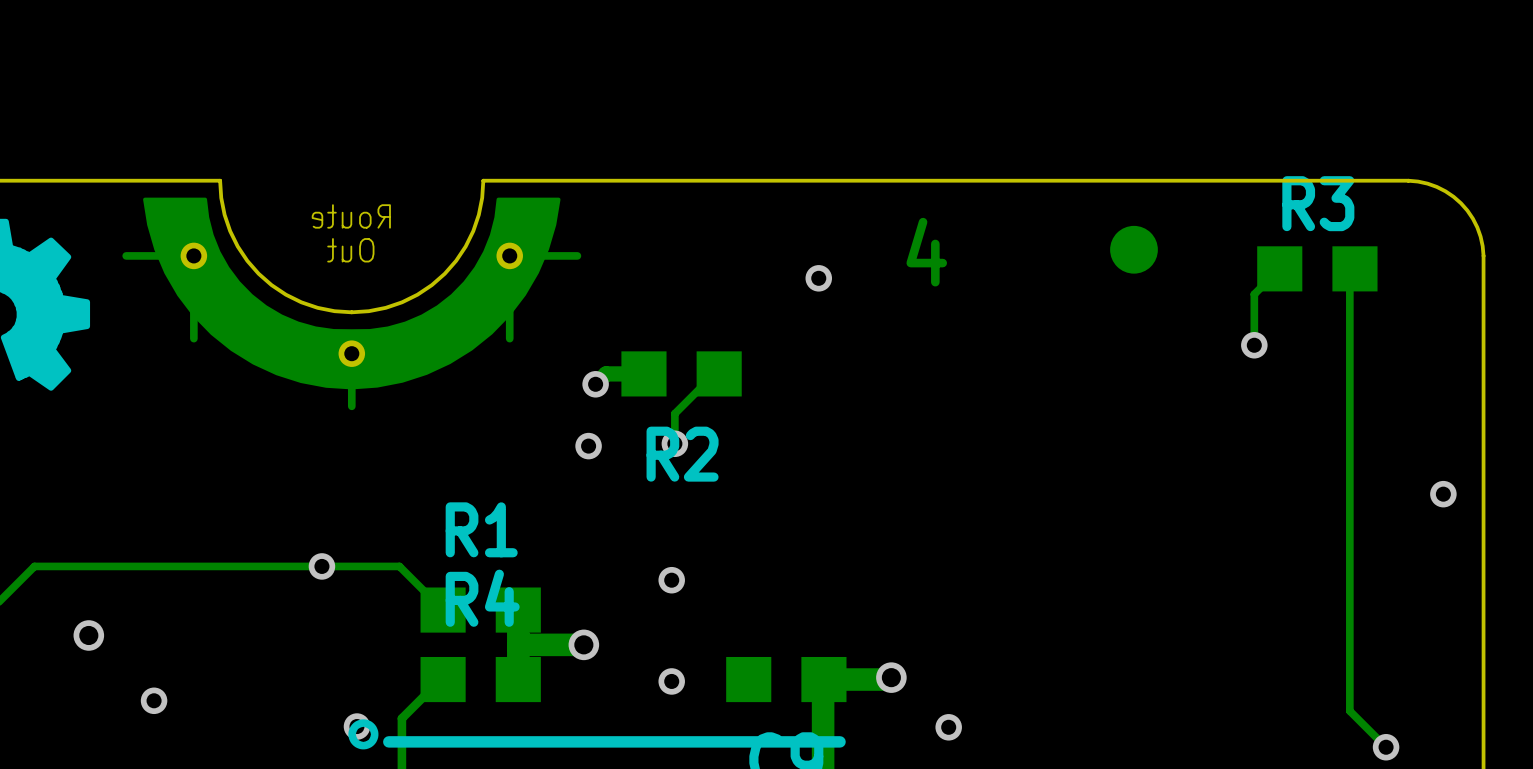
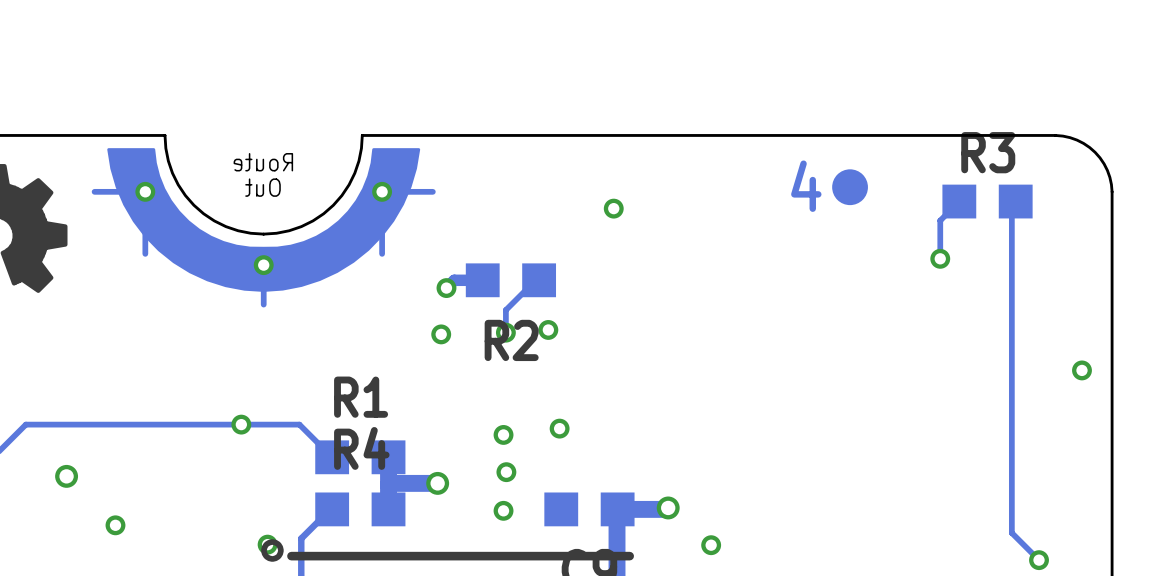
text position: 4 (926, 252) -> 4 (806, 186)
via: none -> (548, 329)
via: none -> (559, 428)
via: none -> (506, 472)

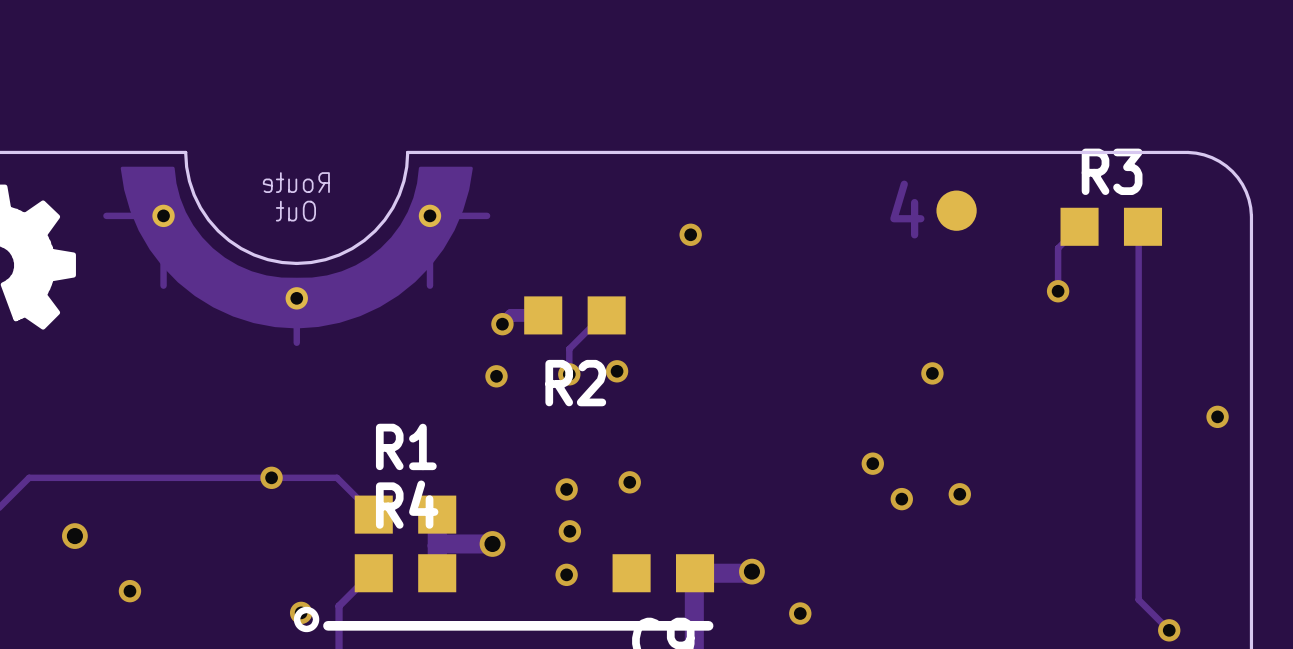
via: none -> (932, 373)
via: none -> (872, 463)
via: none -> (959, 494)
via: none -> (901, 499)

